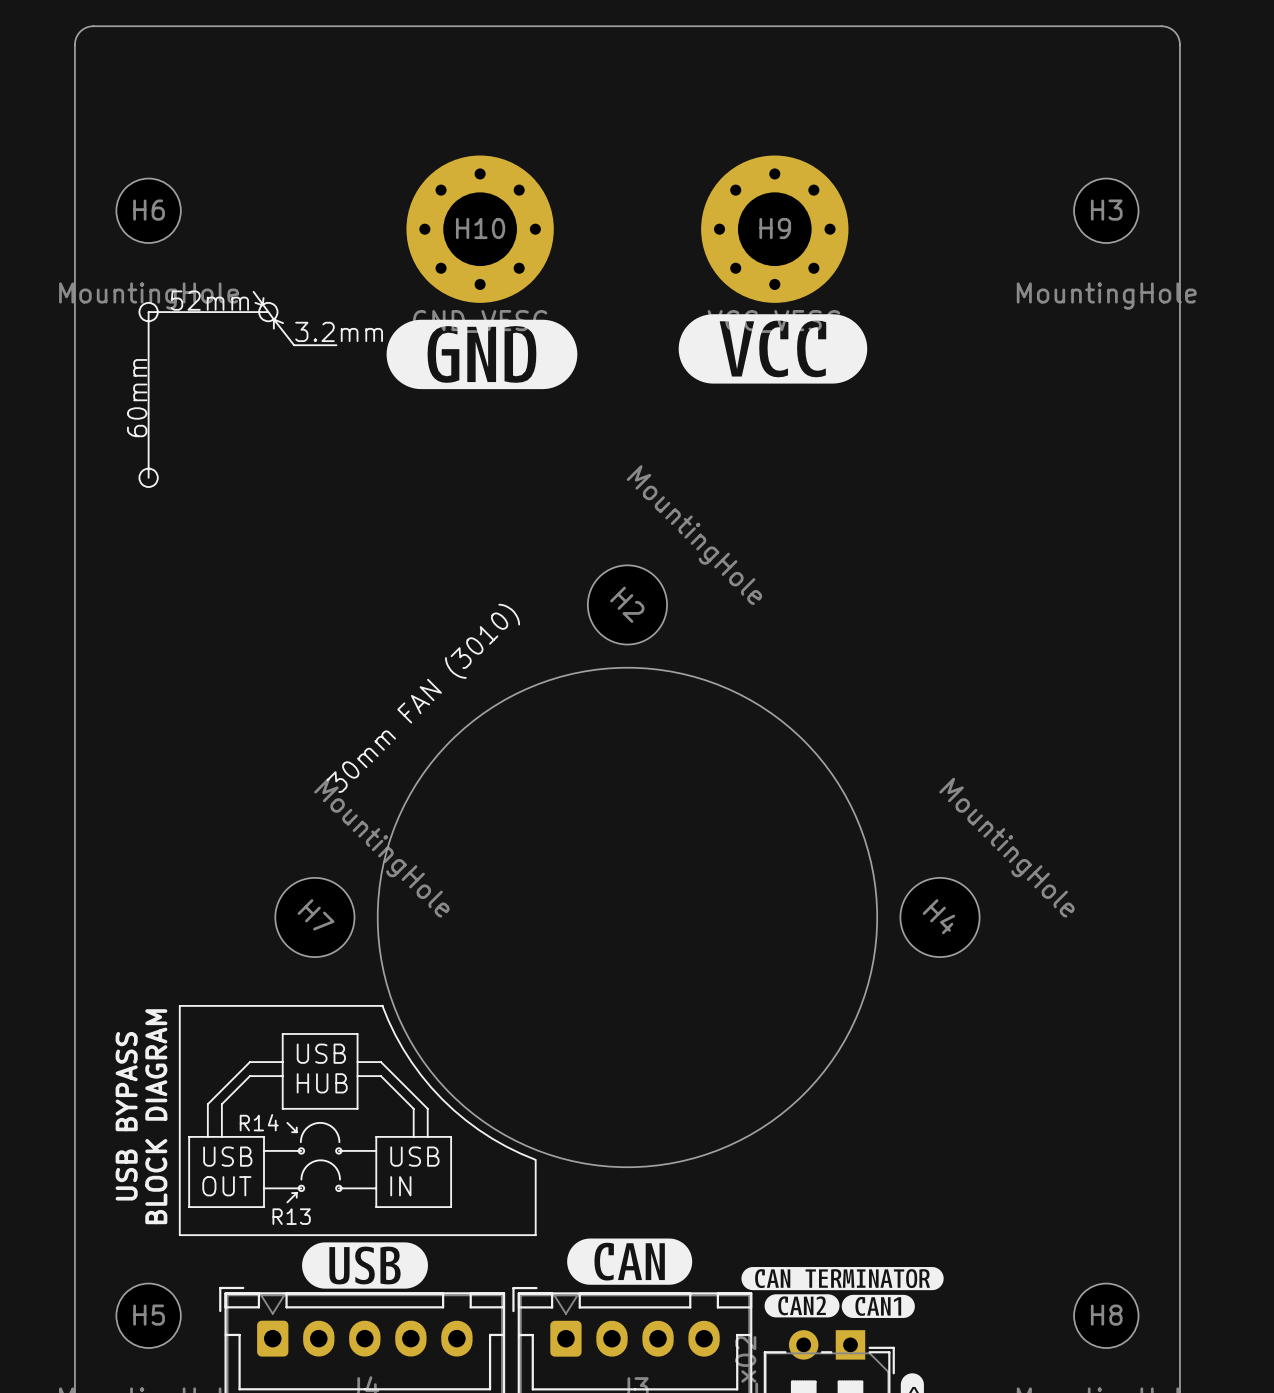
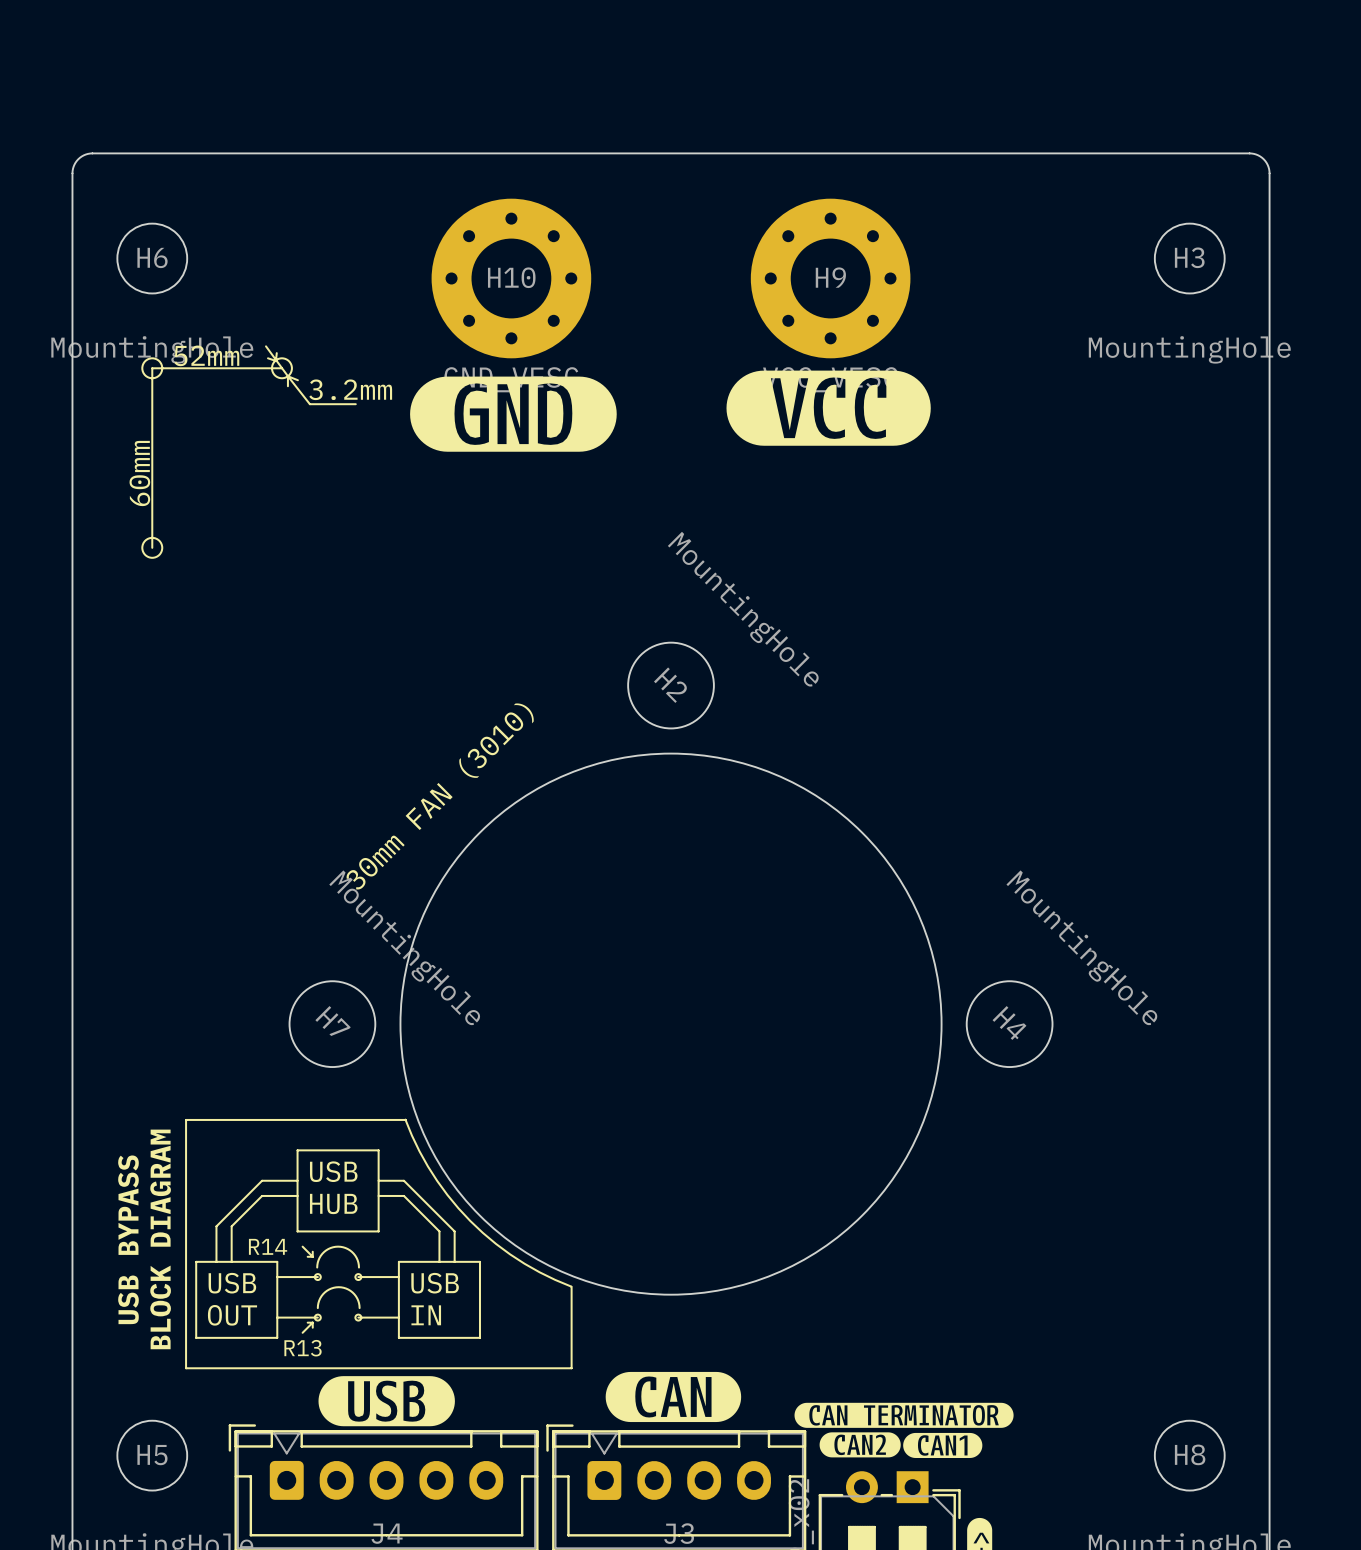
board edge: (74, 132) (75, 40) (81, 30) (93, 26) (1163, 26) (1174, 31) (1179, 42) (1179, 132) -> (72, 173) (78, 159) (92, 153) (1249, 153) (1263, 159) (1269, 173)

